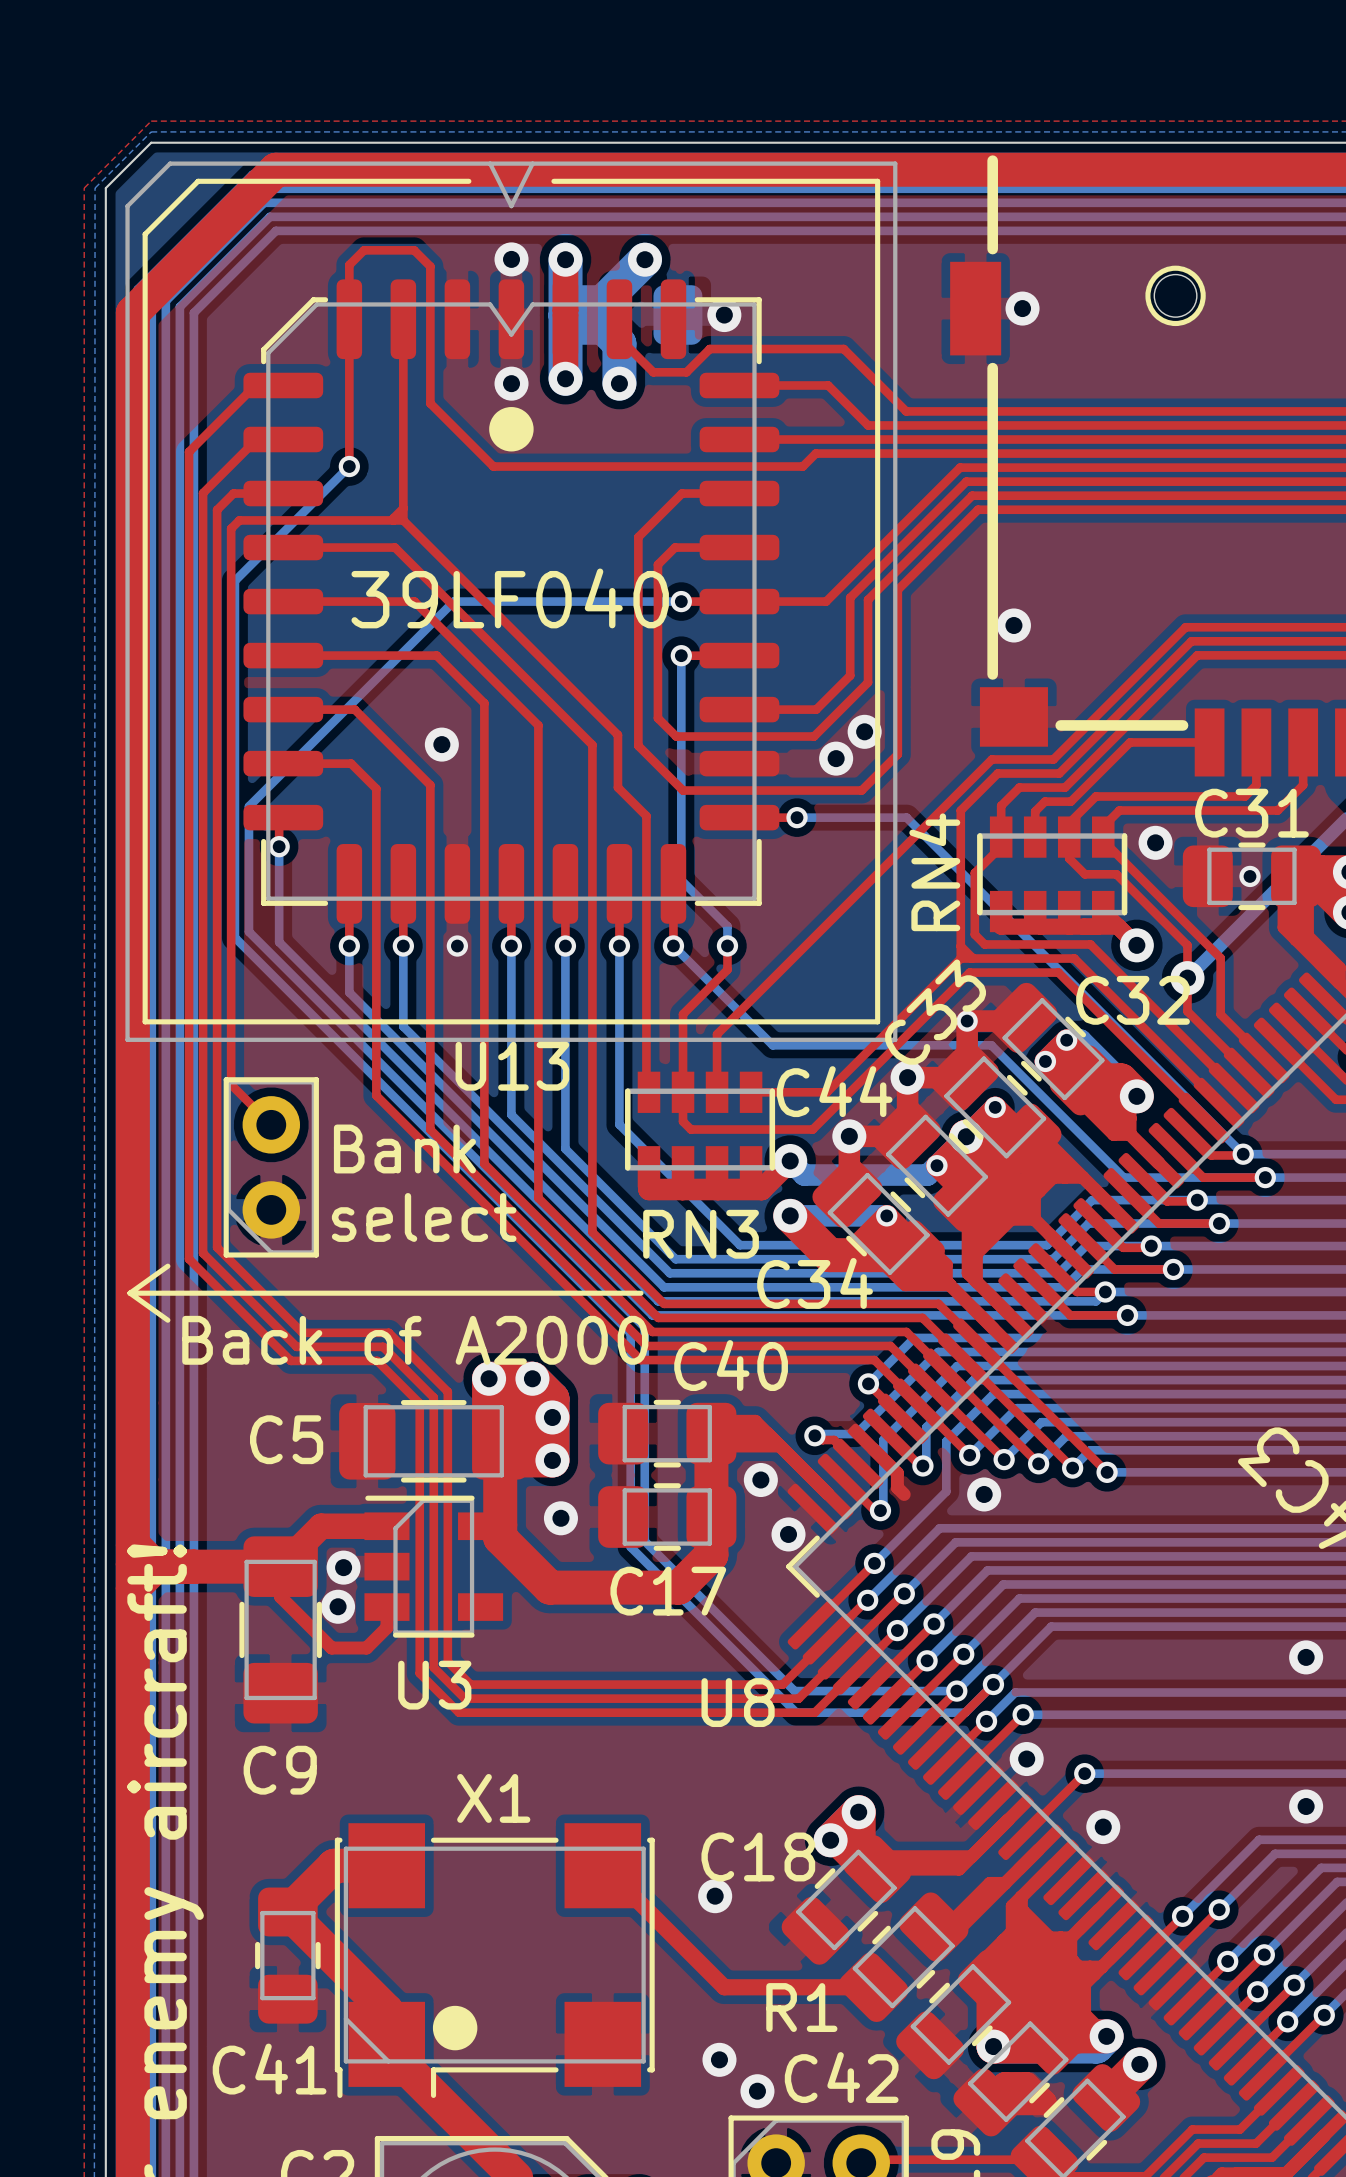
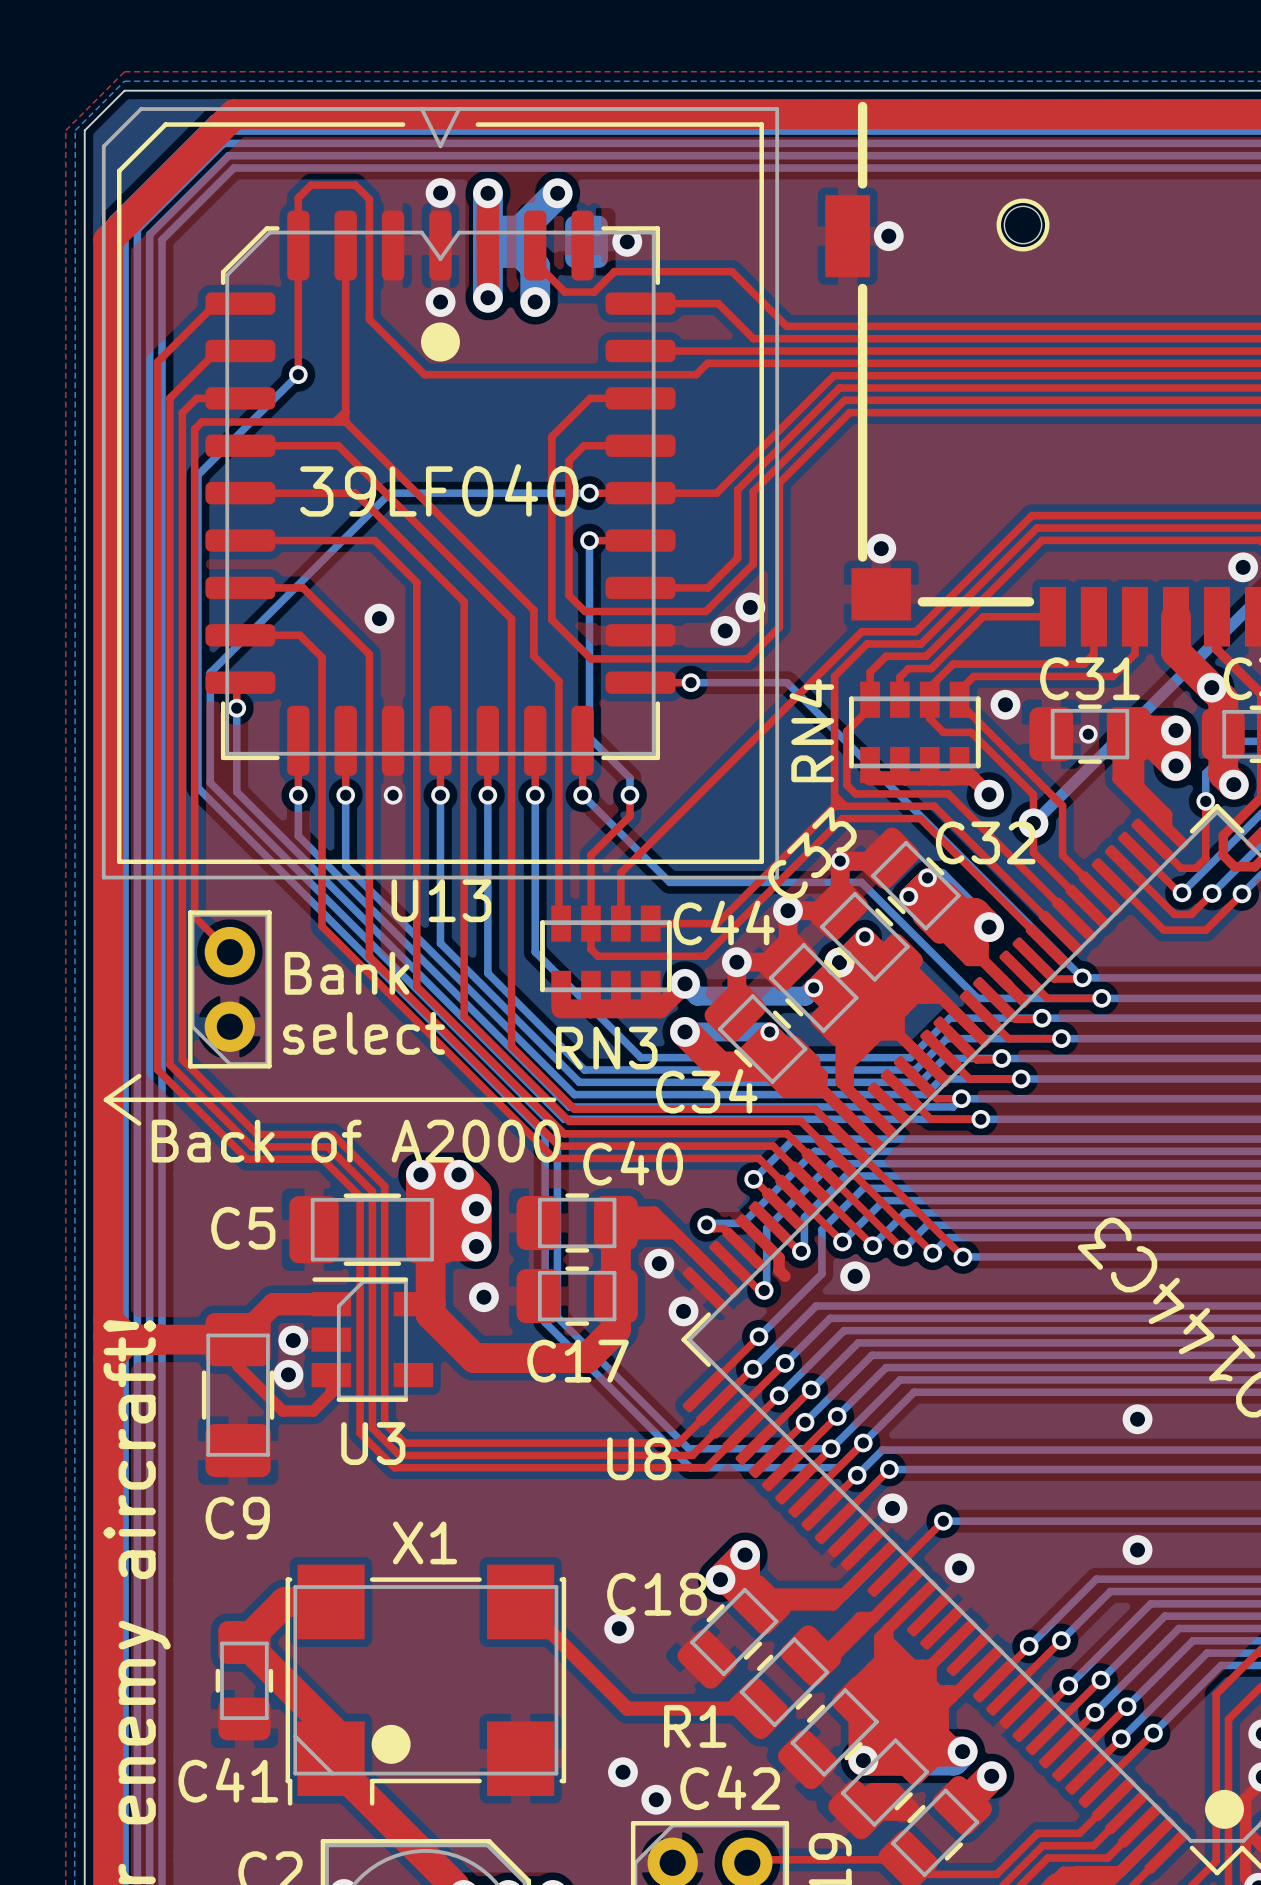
via position: (1013, 625) -> (881, 548)

